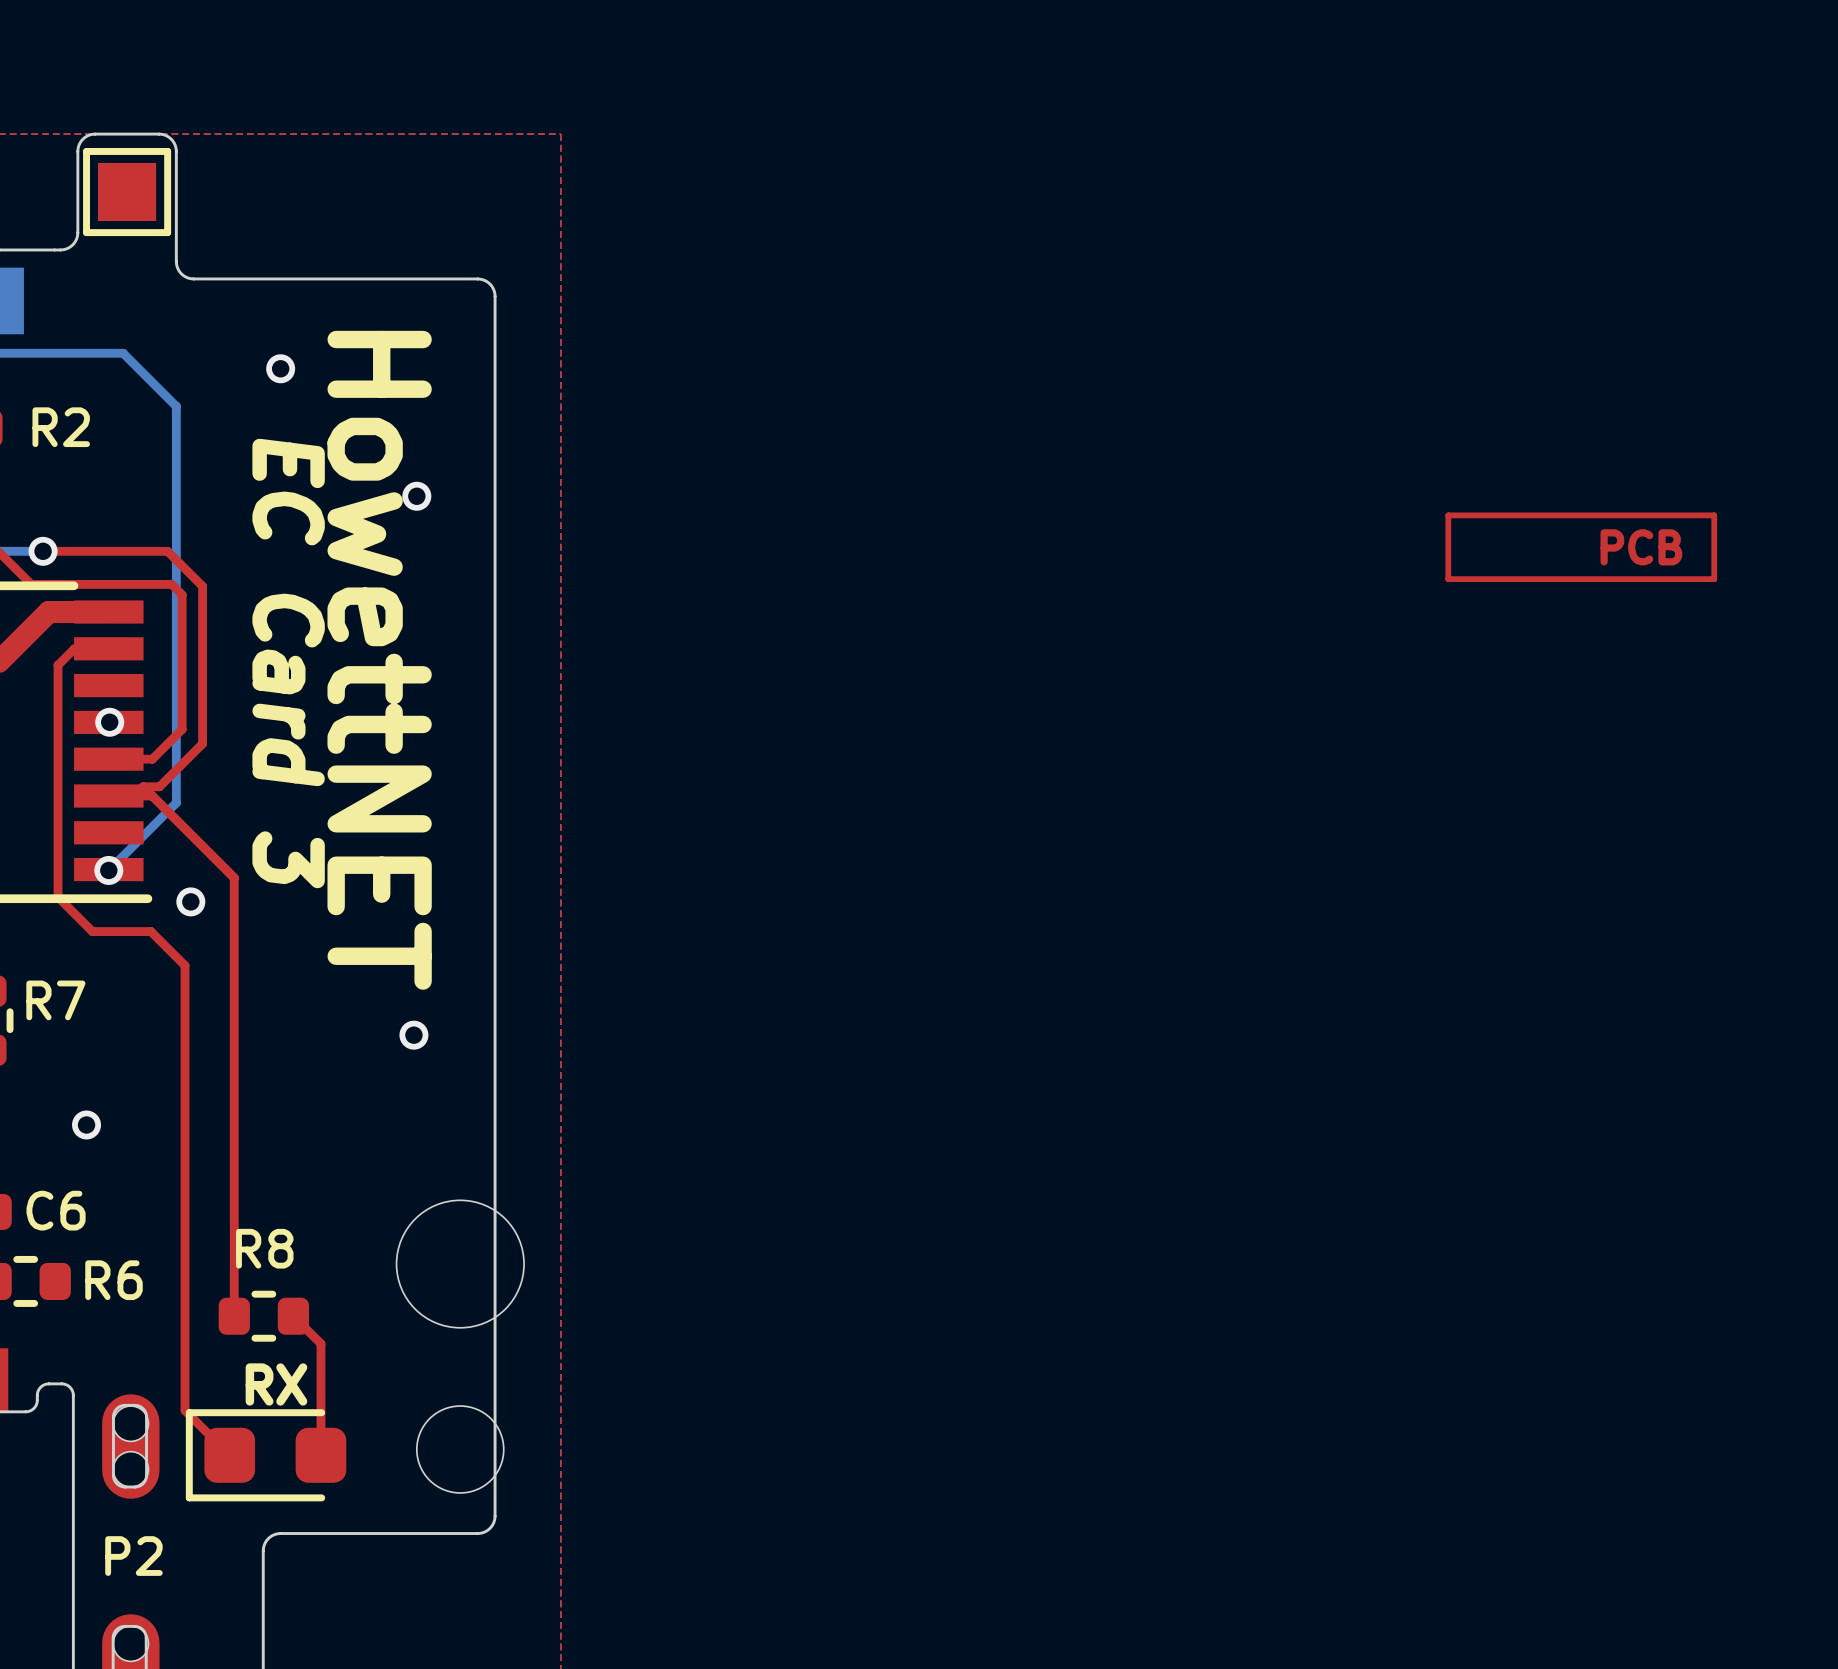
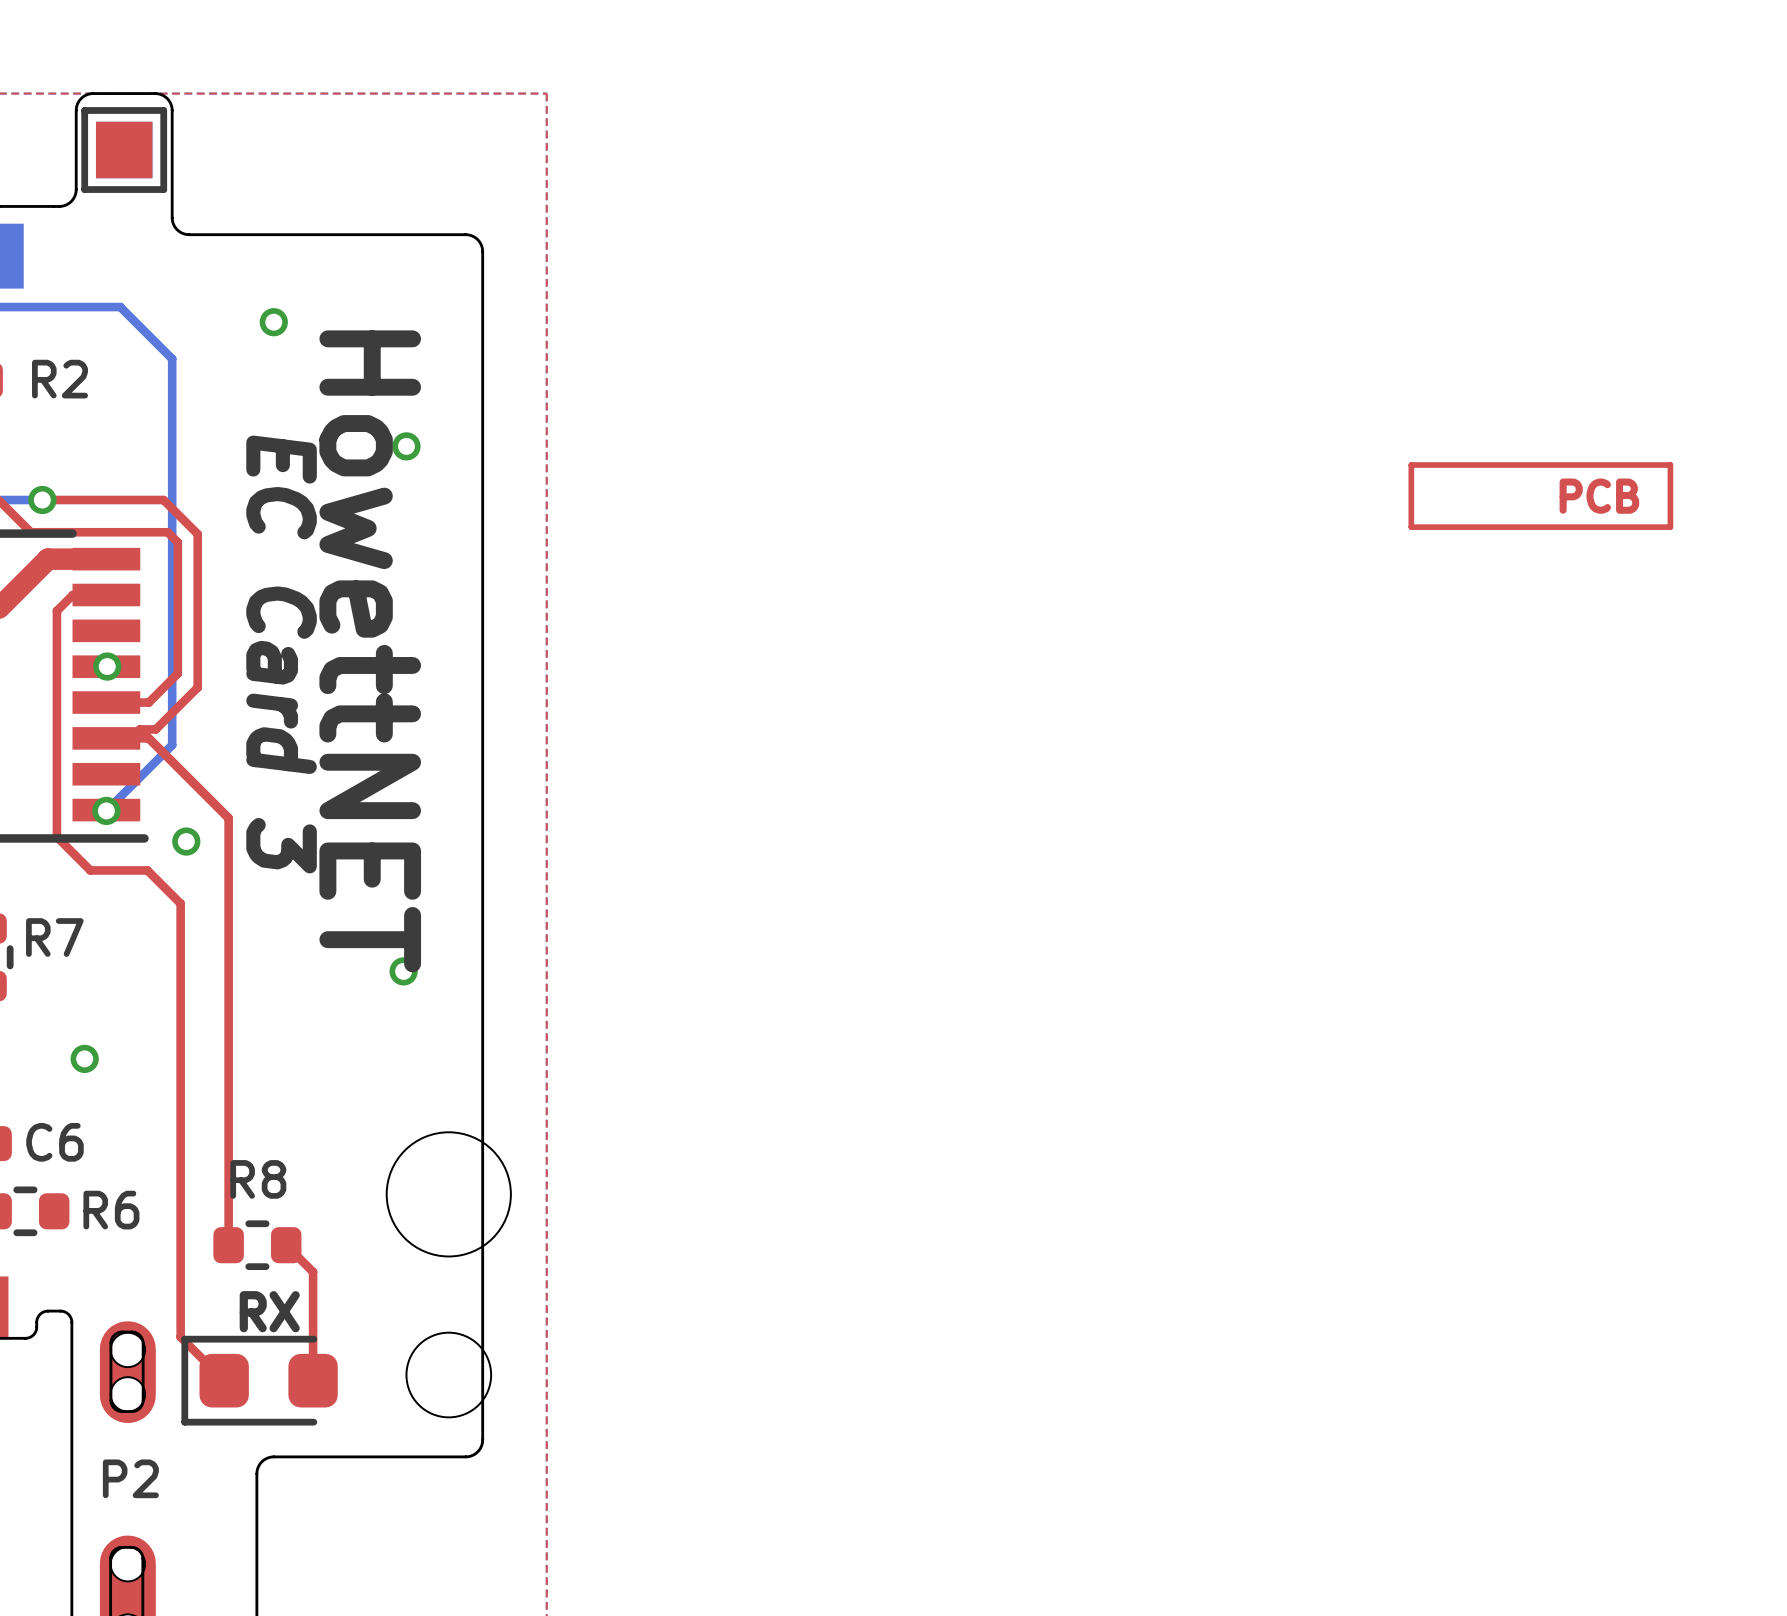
text position: HowettNET (379, 660) -> HowettNET (370, 651)
text position: EC Card 3 (288, 663) -> EC Card 3 (281, 654)

